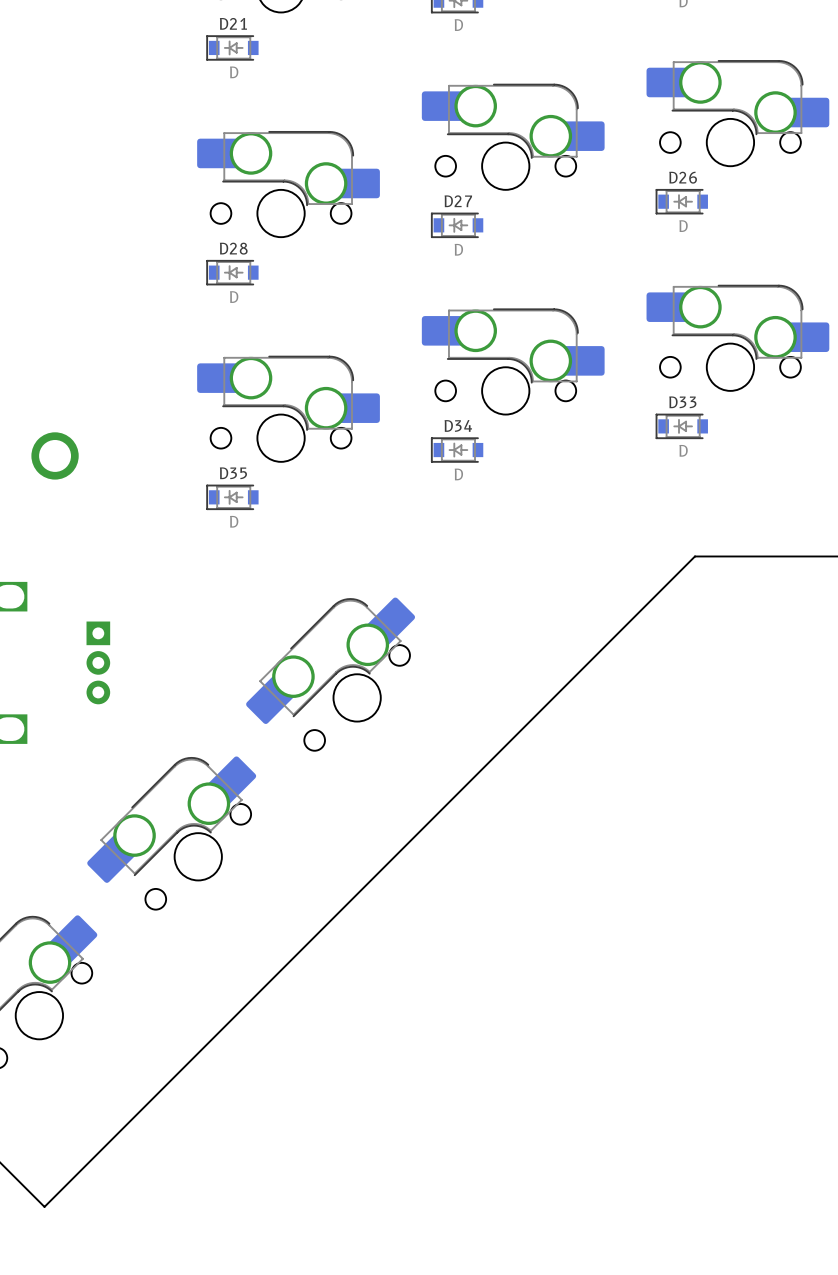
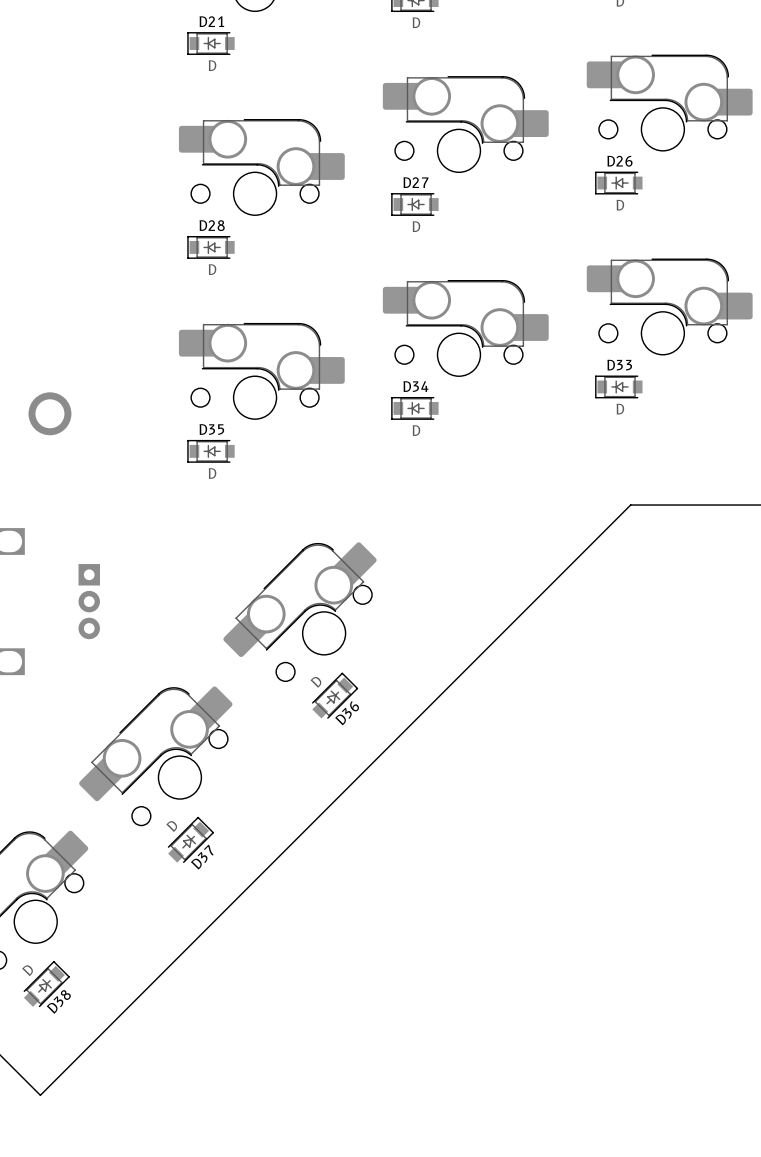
D36: none -> D (335, 695)
D37: none -> D (190, 839)
D38: none -> D (46, 984)

